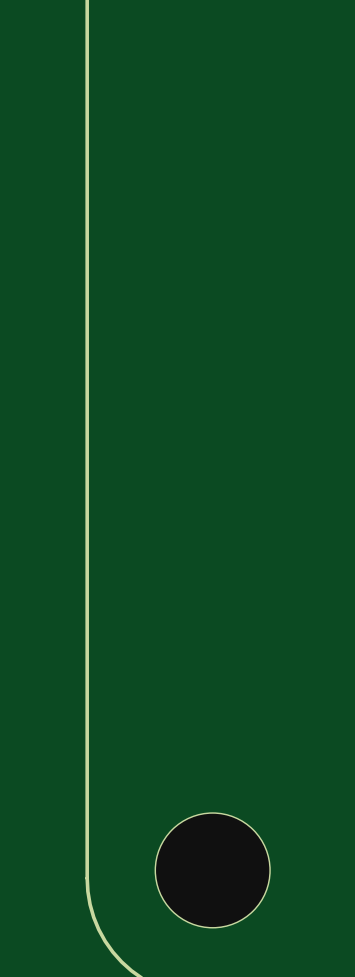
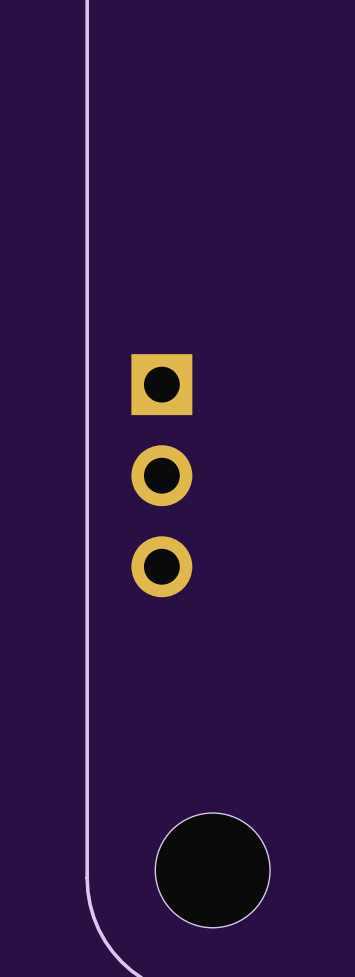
part: none -> (161, 475)

